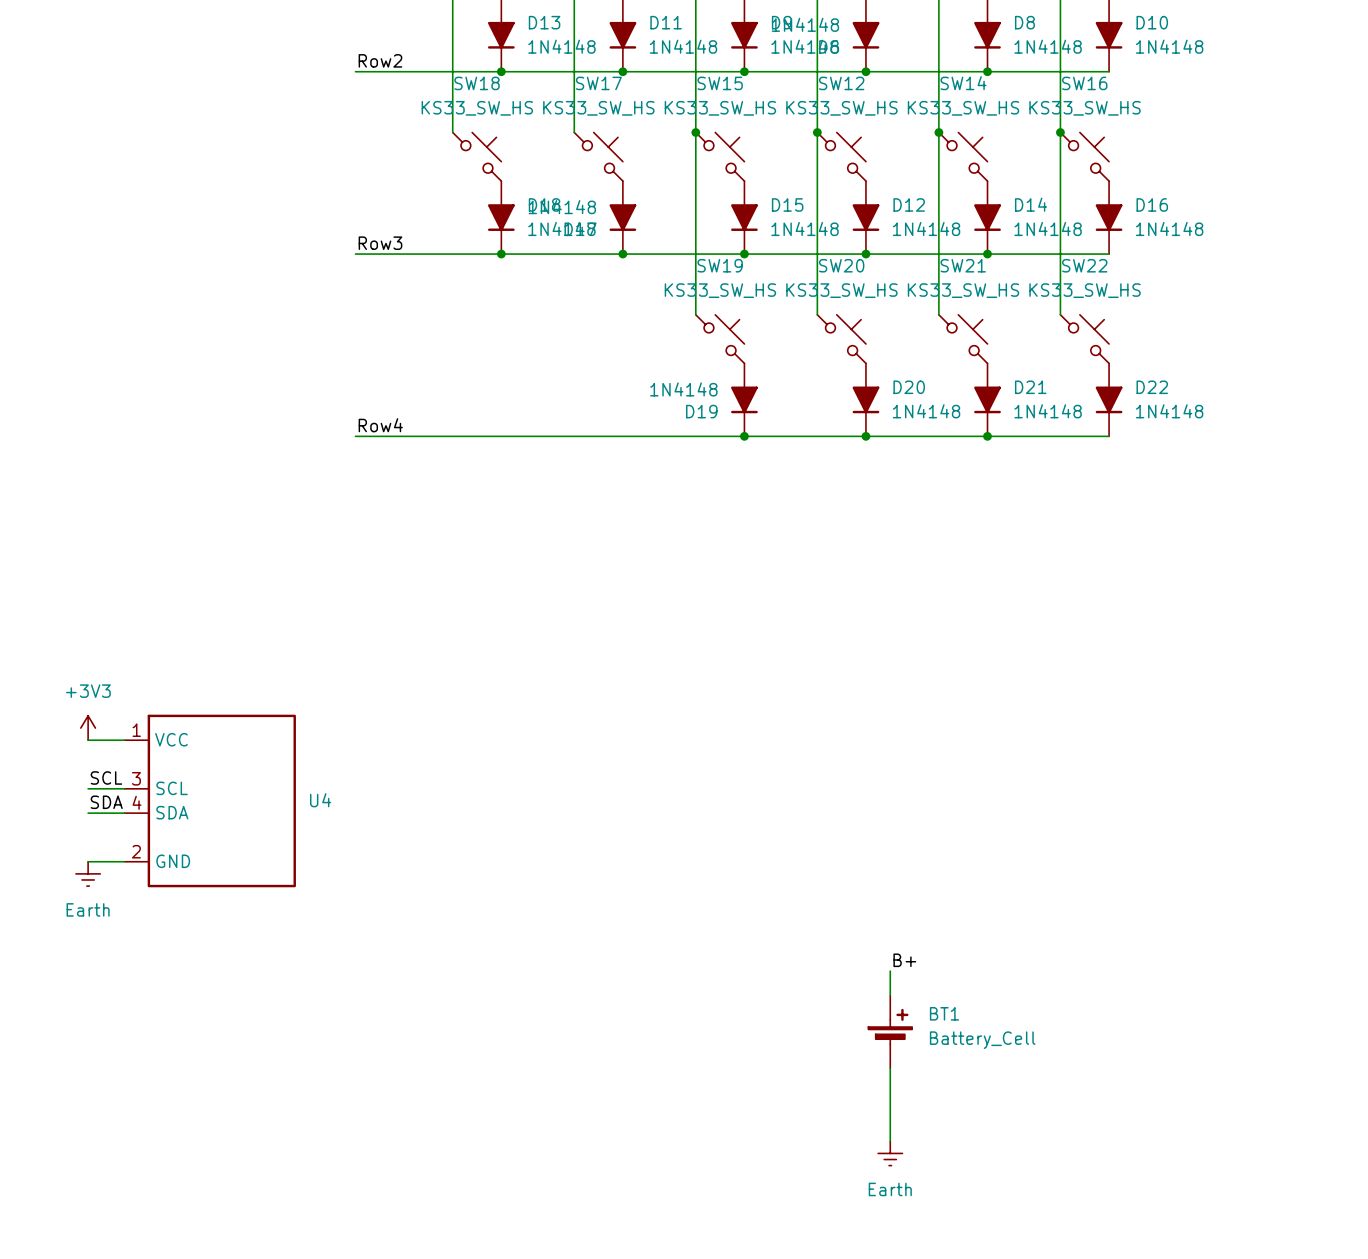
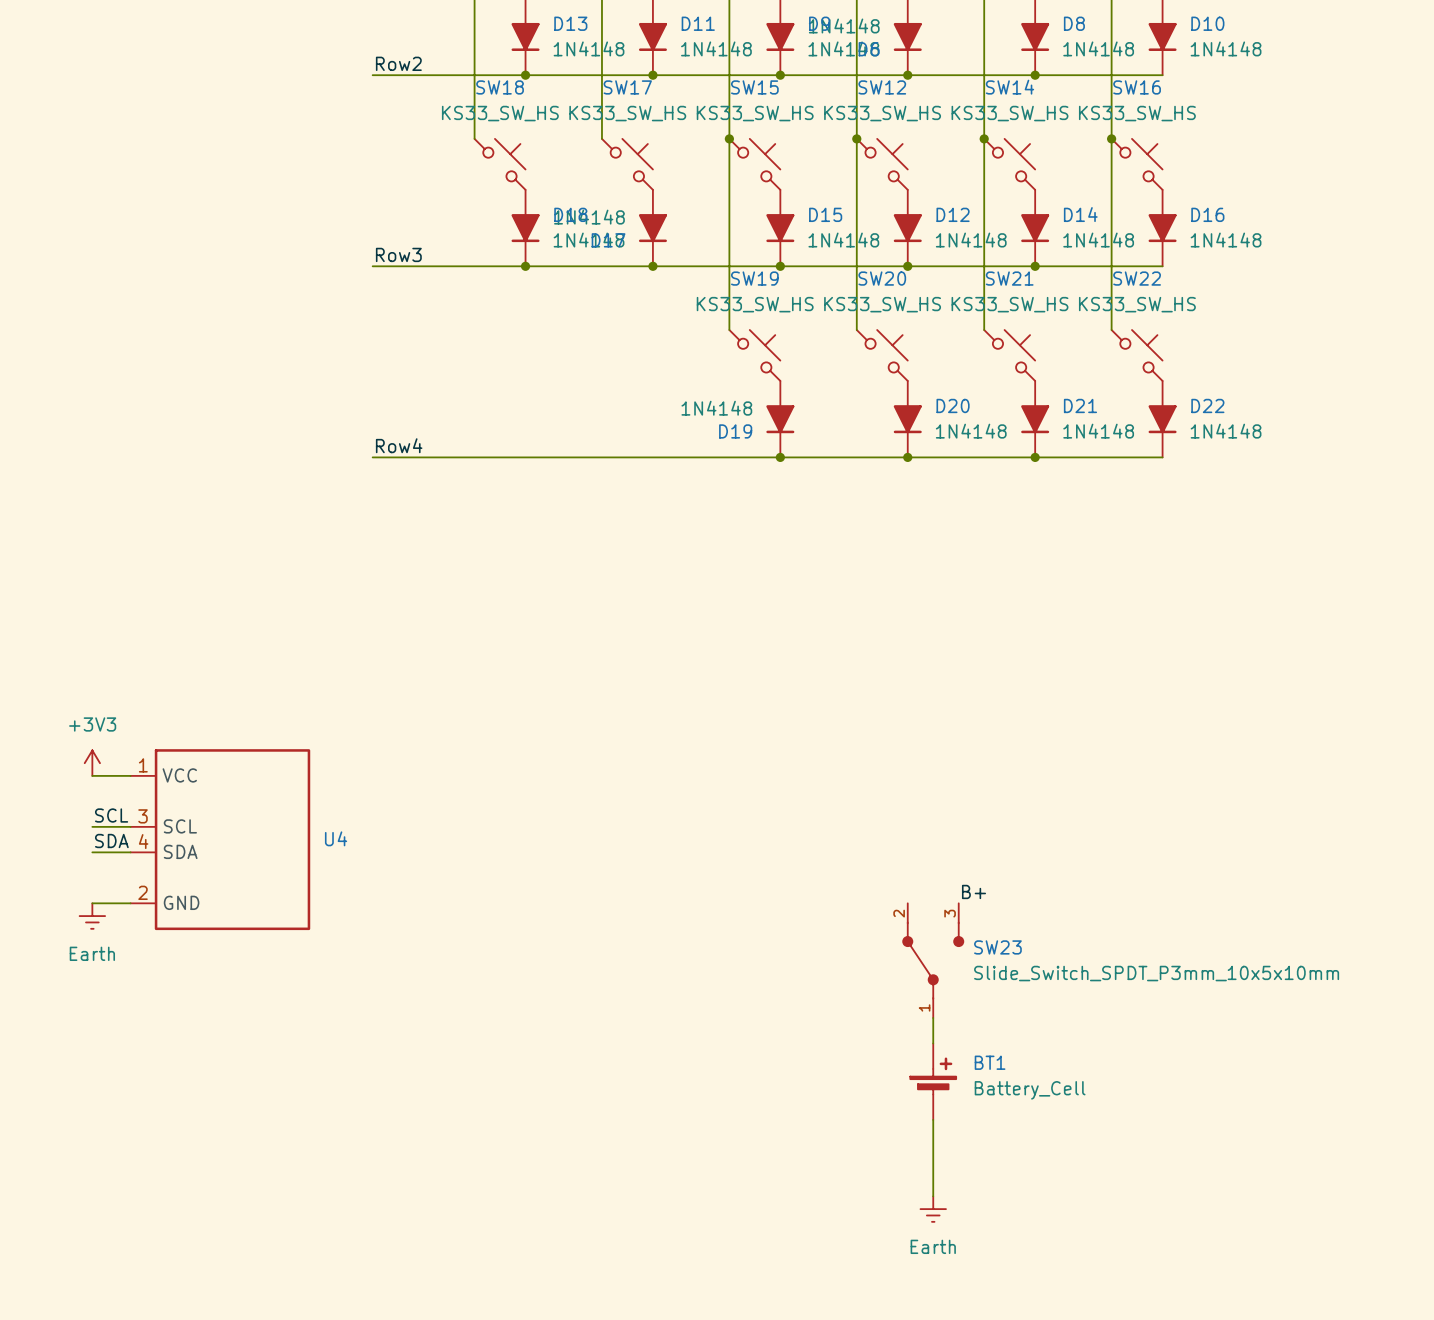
SW23: none -> Slide_Switch_SPDT_P3mm_10x5x10mm (933, 960)
label position: B+ (904, 960) -> B+ (973, 891)

